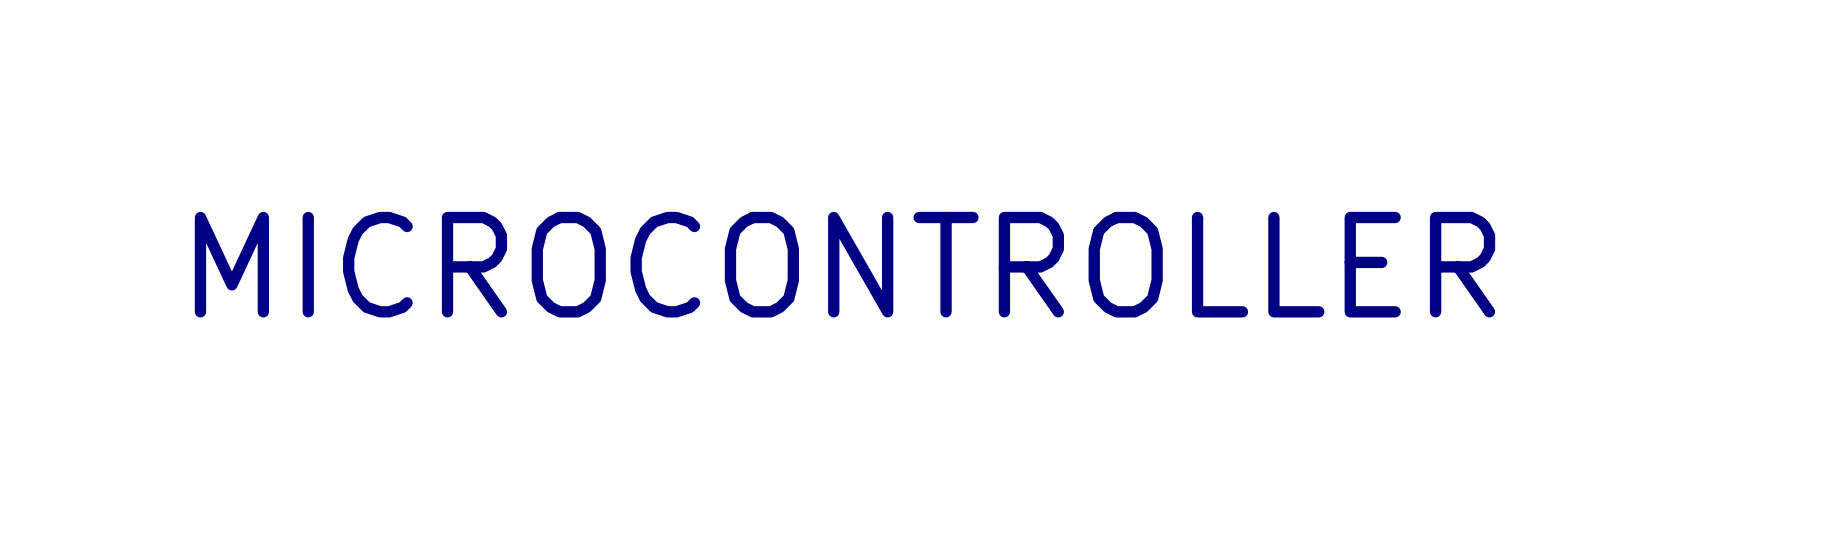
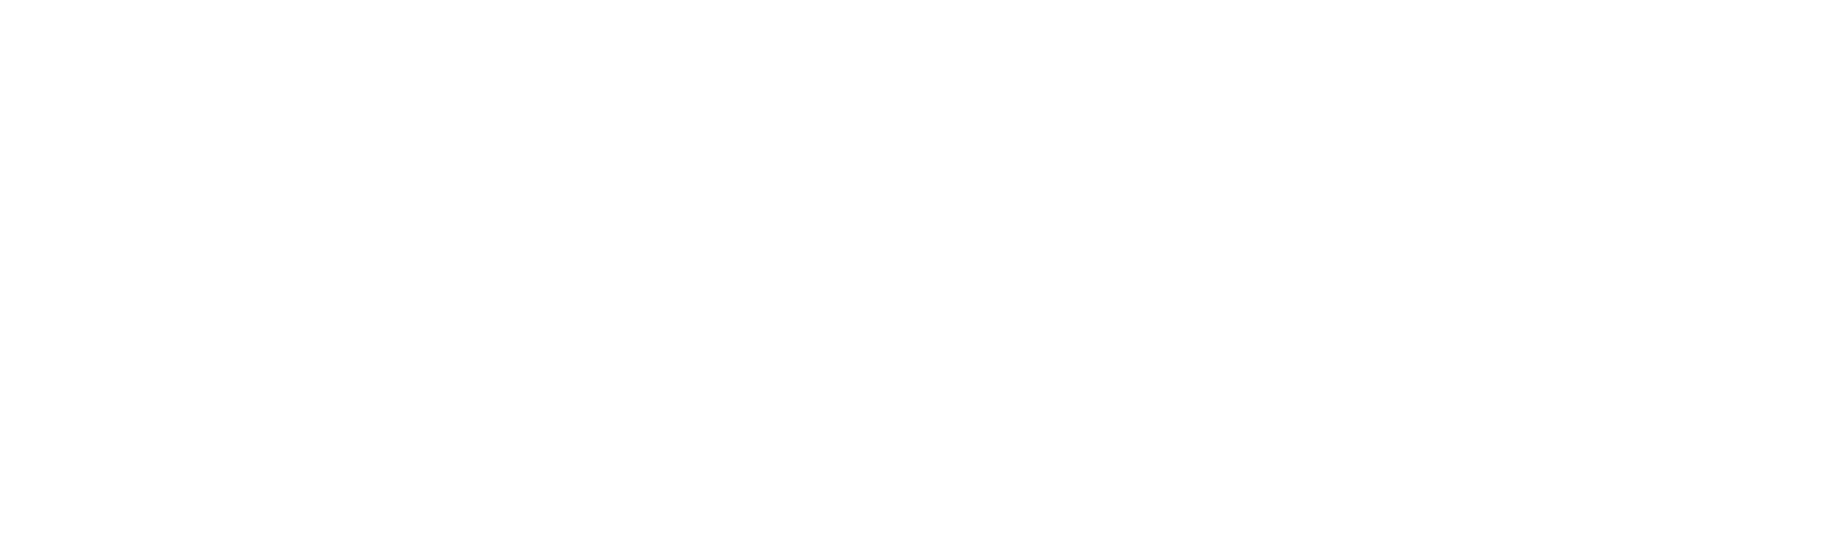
text: MICROCONTROLLER (844, 264) -> none

